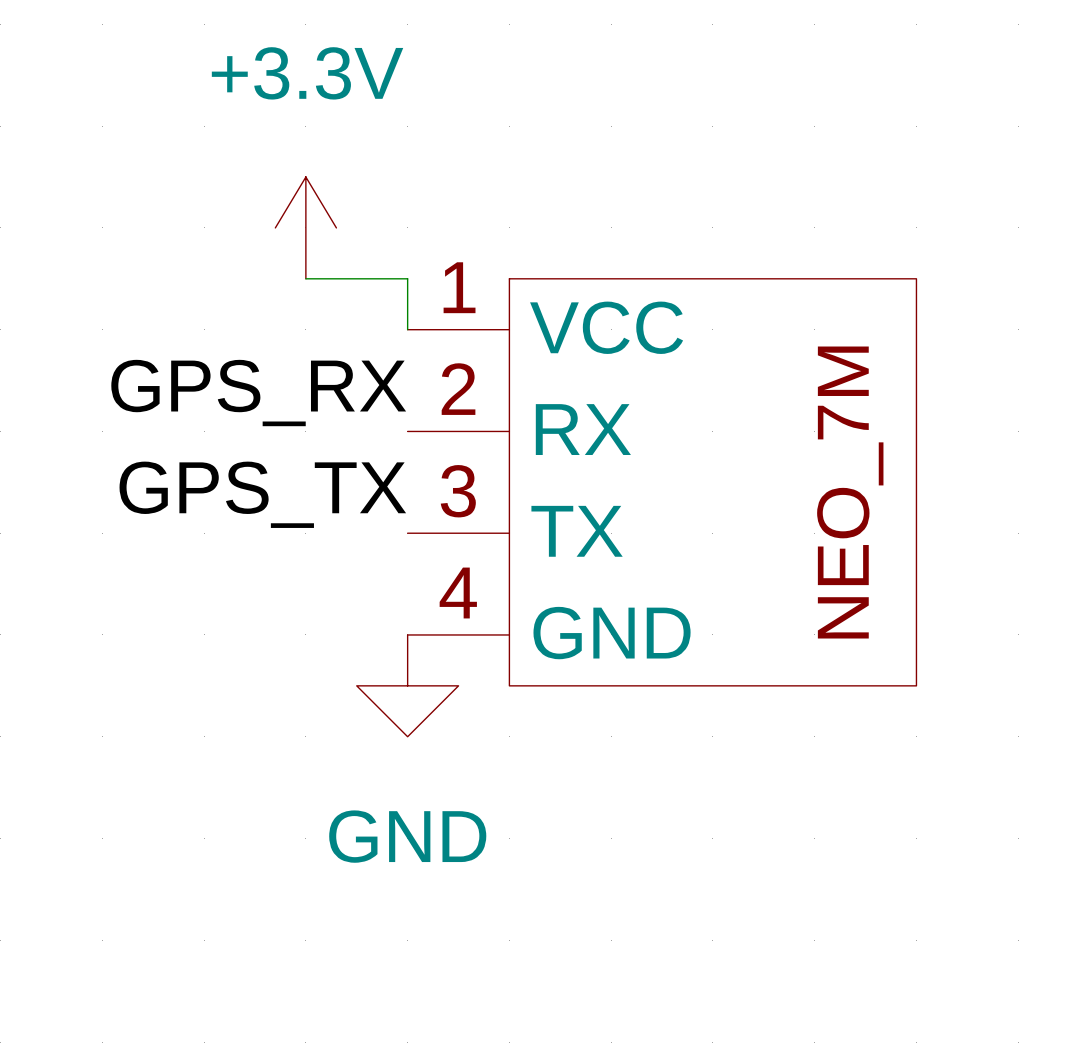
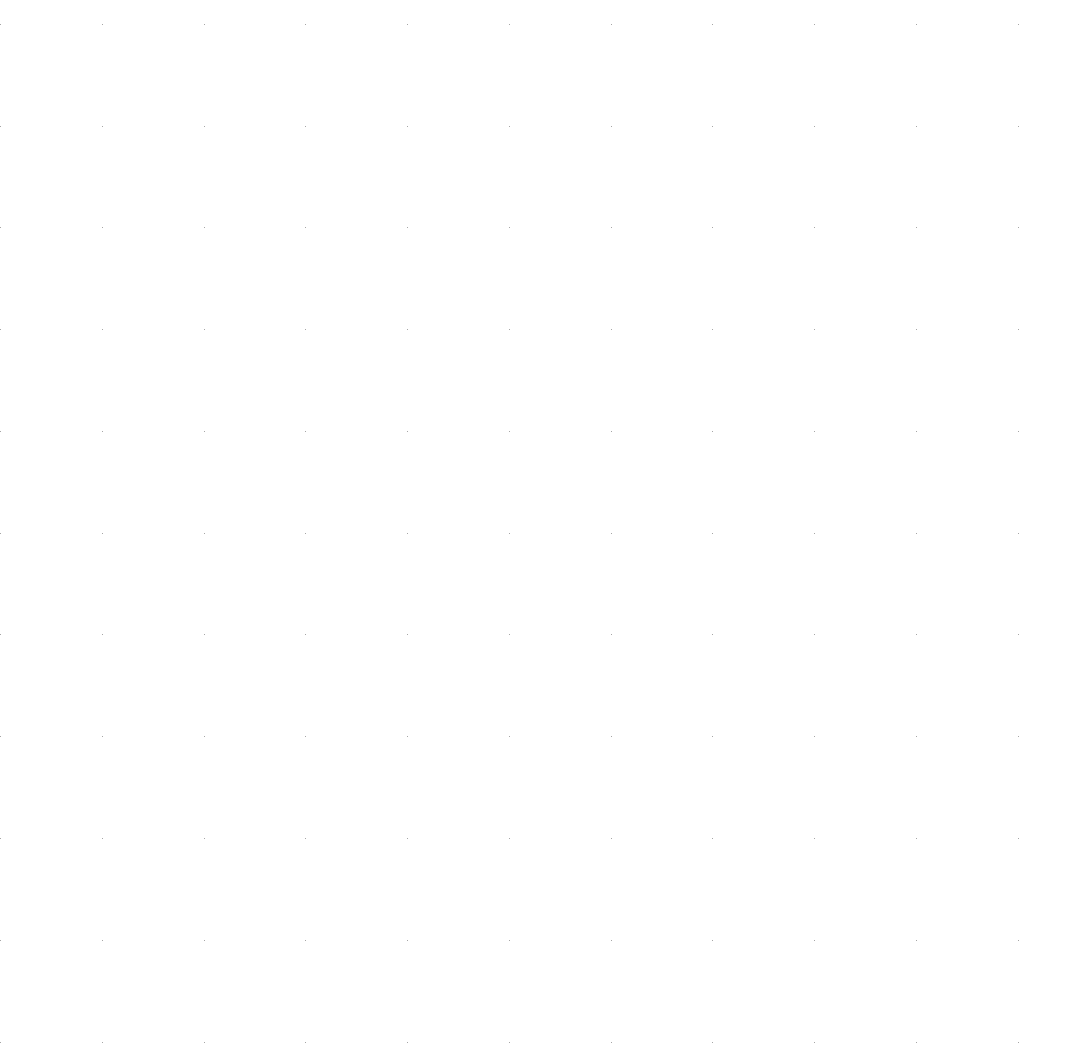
power symbol: +3.3V (305, 227) -> none
wire: (305, 278) (407, 278) (407, 329) -> none
label: GPS_RX (258, 393) -> none
part: (662, 482) -> none
label: GPS_TX (262, 494) -> none
power symbol: GND (407, 685) -> none

